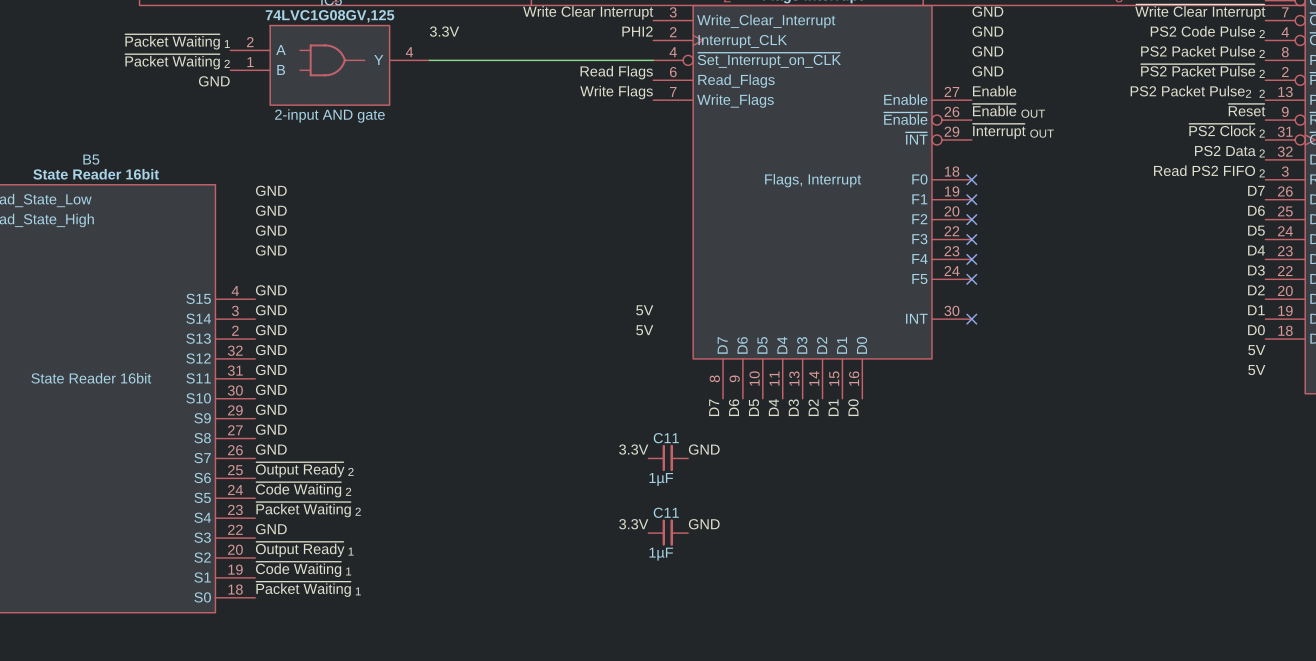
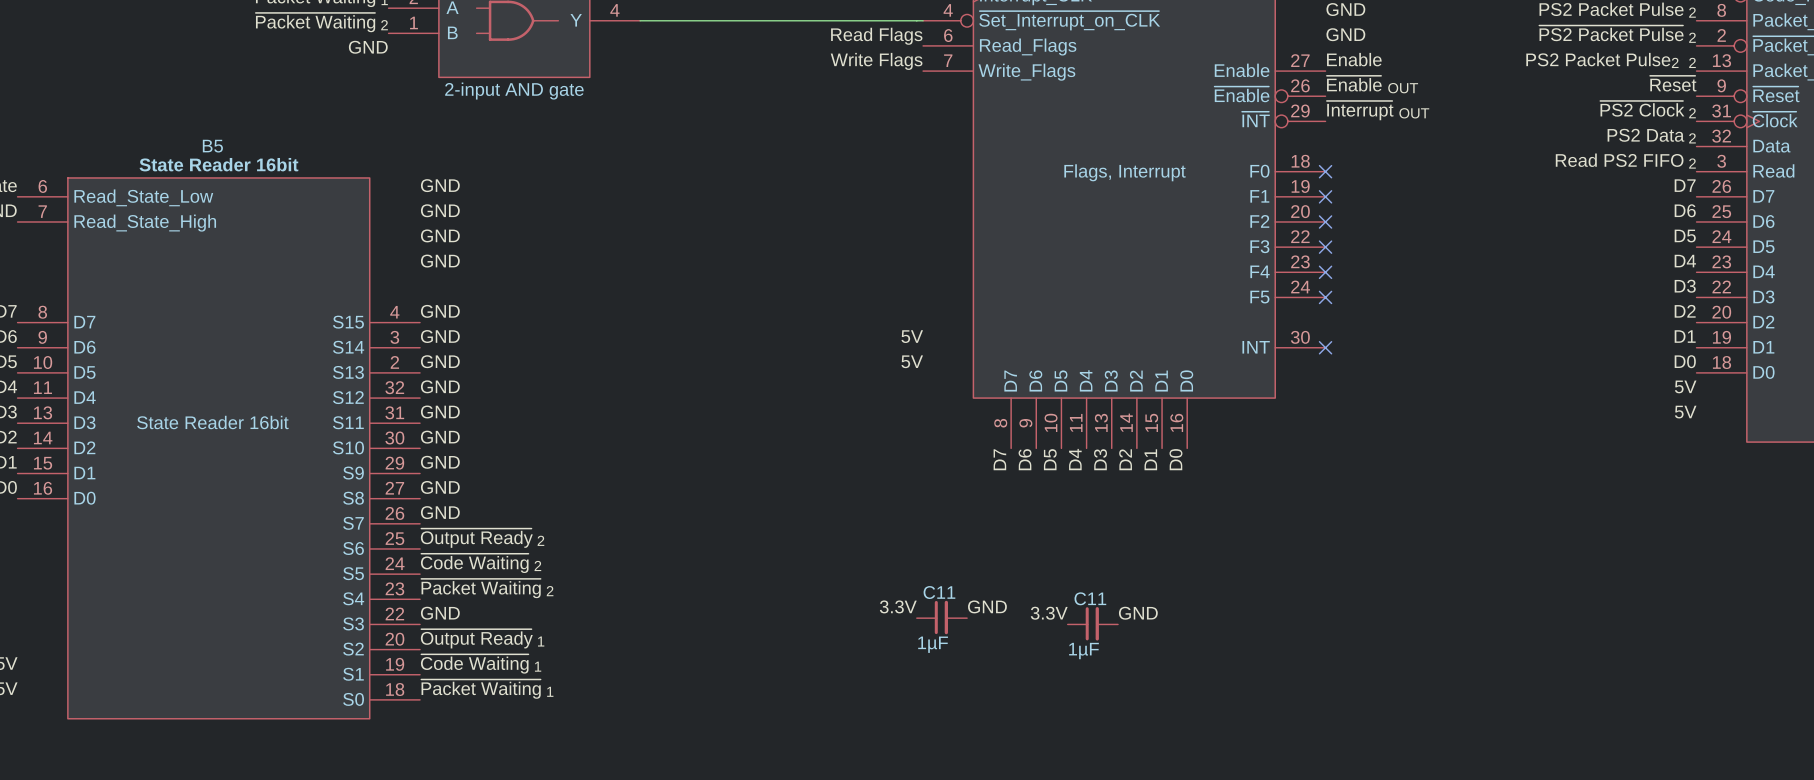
label position: 3.3V (633, 449) -> 3.3V (1049, 613)
label position: GND (704, 449) -> GND (1138, 613)
C11 position: (668, 457) -> (1092, 623)

